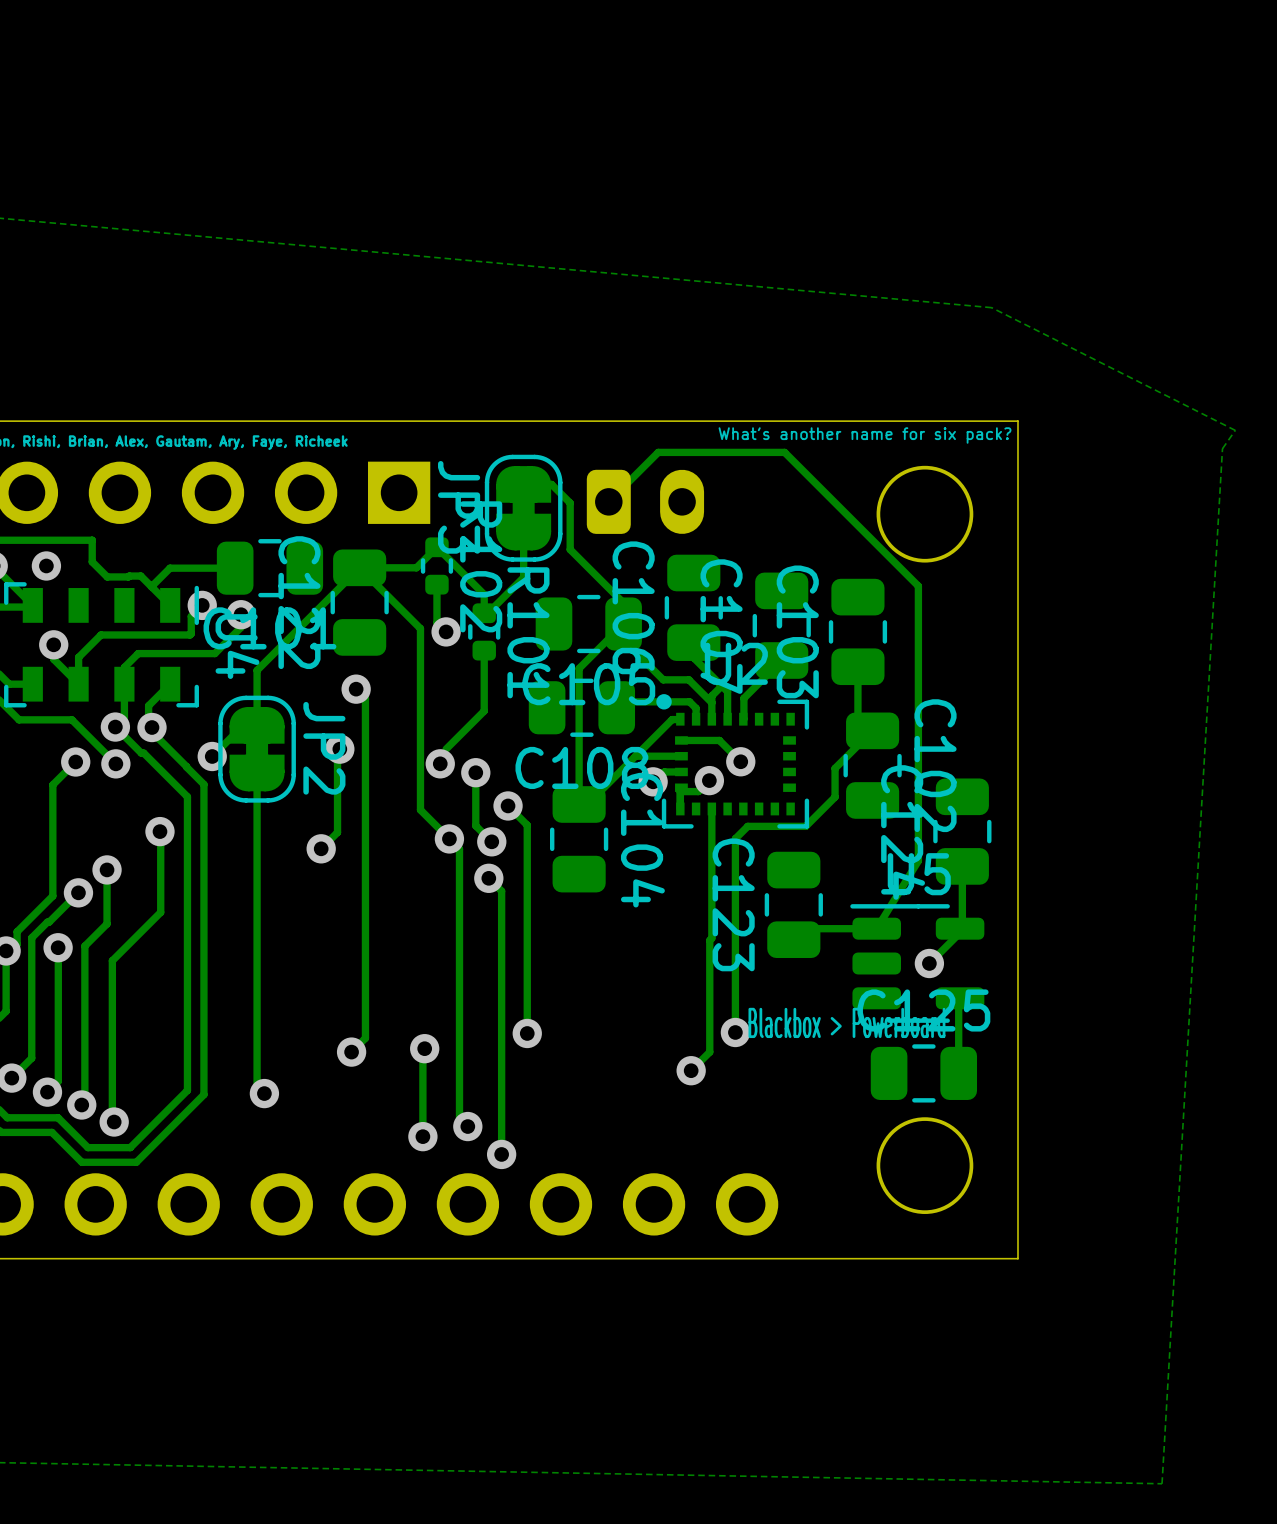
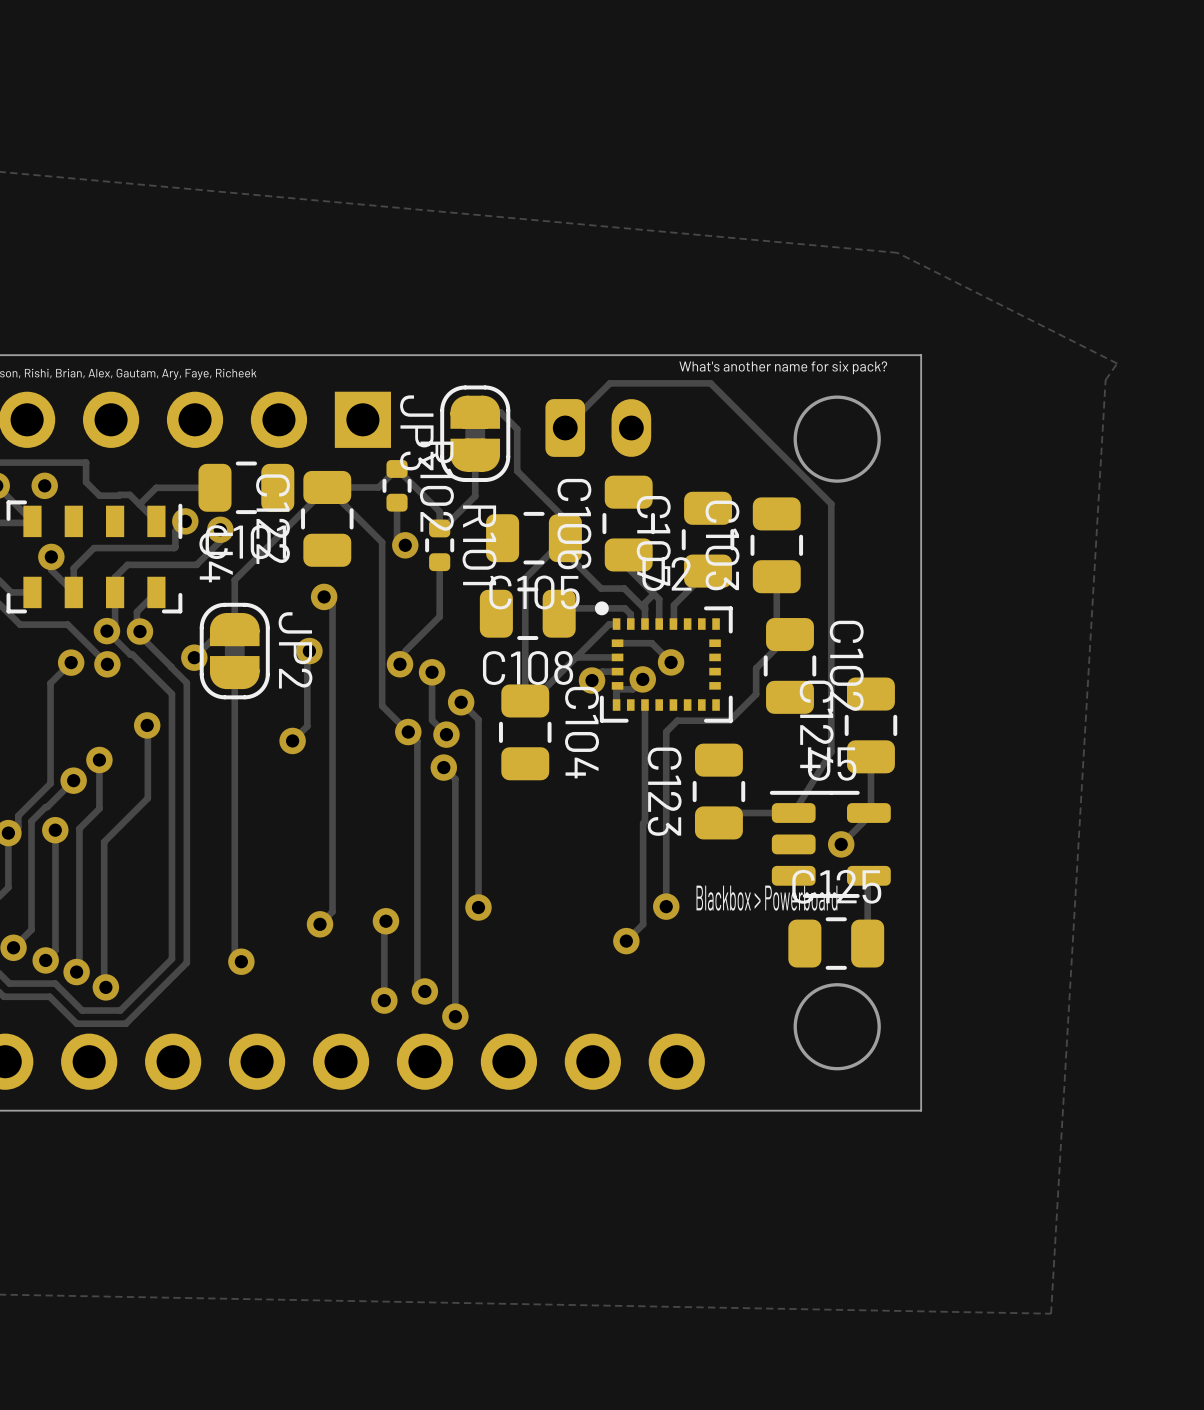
track: (672, 452) (658, 452) (608, 501) -> (609, 383) (565, 427)
part position: (645, 501) -> (598, 427)

